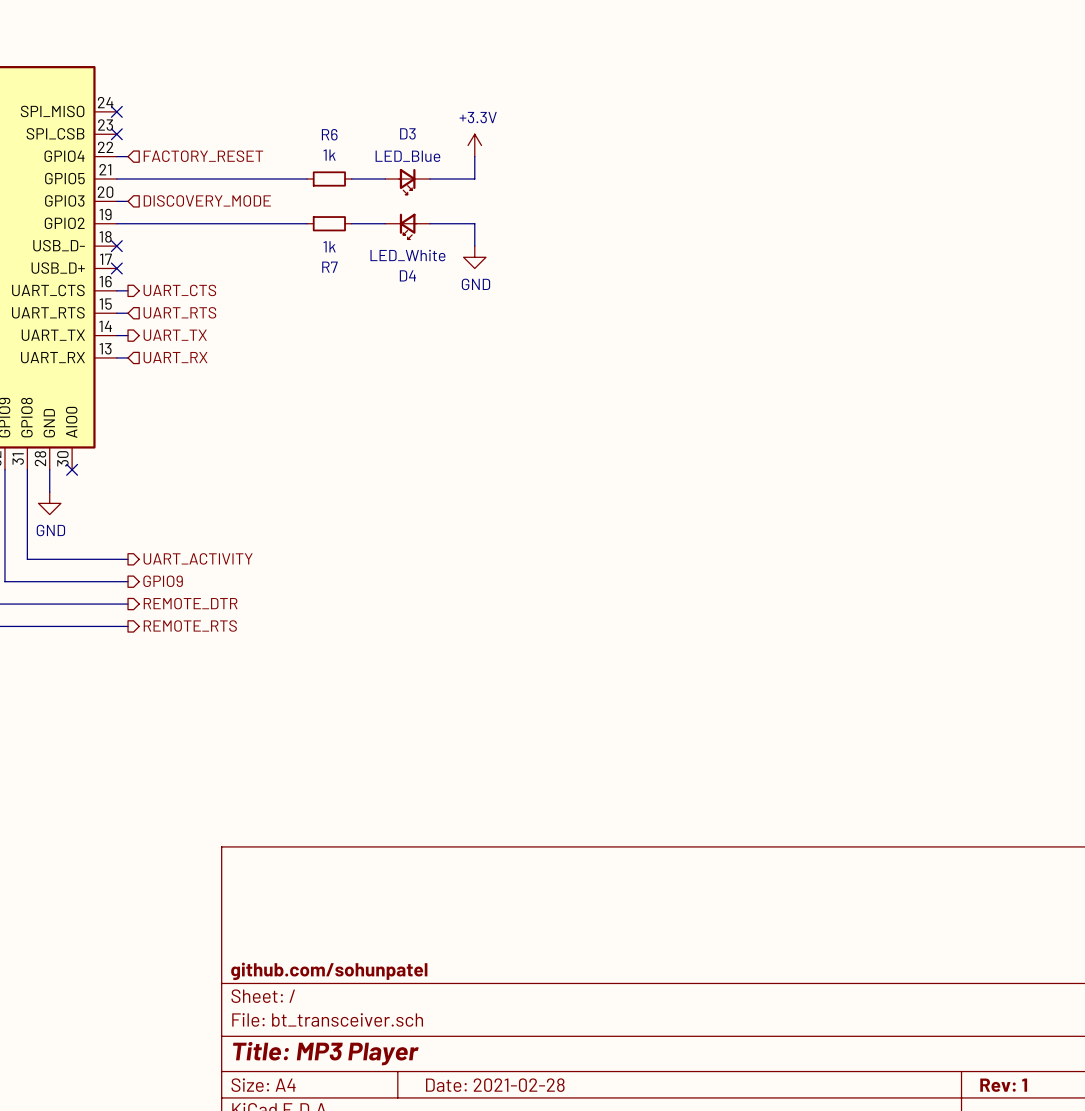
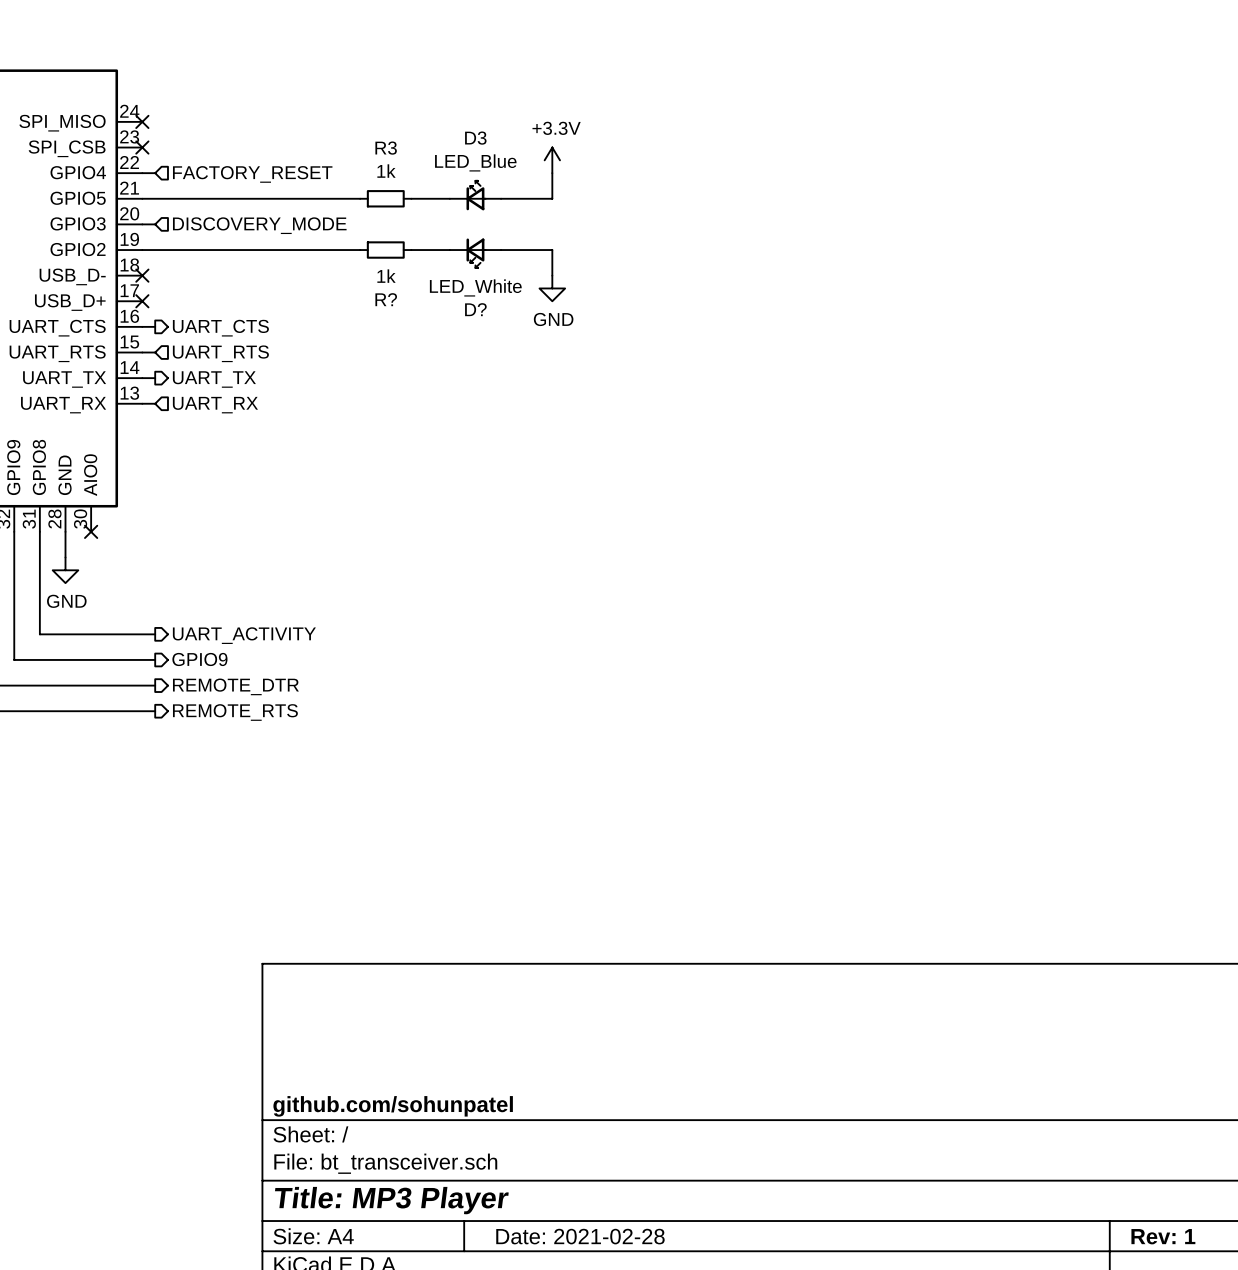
R6 name: R6 (329, 134) -> R3 (386, 148)
D3 rotation: 0° (407, 181) -> 180° (476, 195)
R7 name: R7 (329, 267) -> R? (386, 299)
D4 name: D4 (407, 275) -> D? (475, 309)

